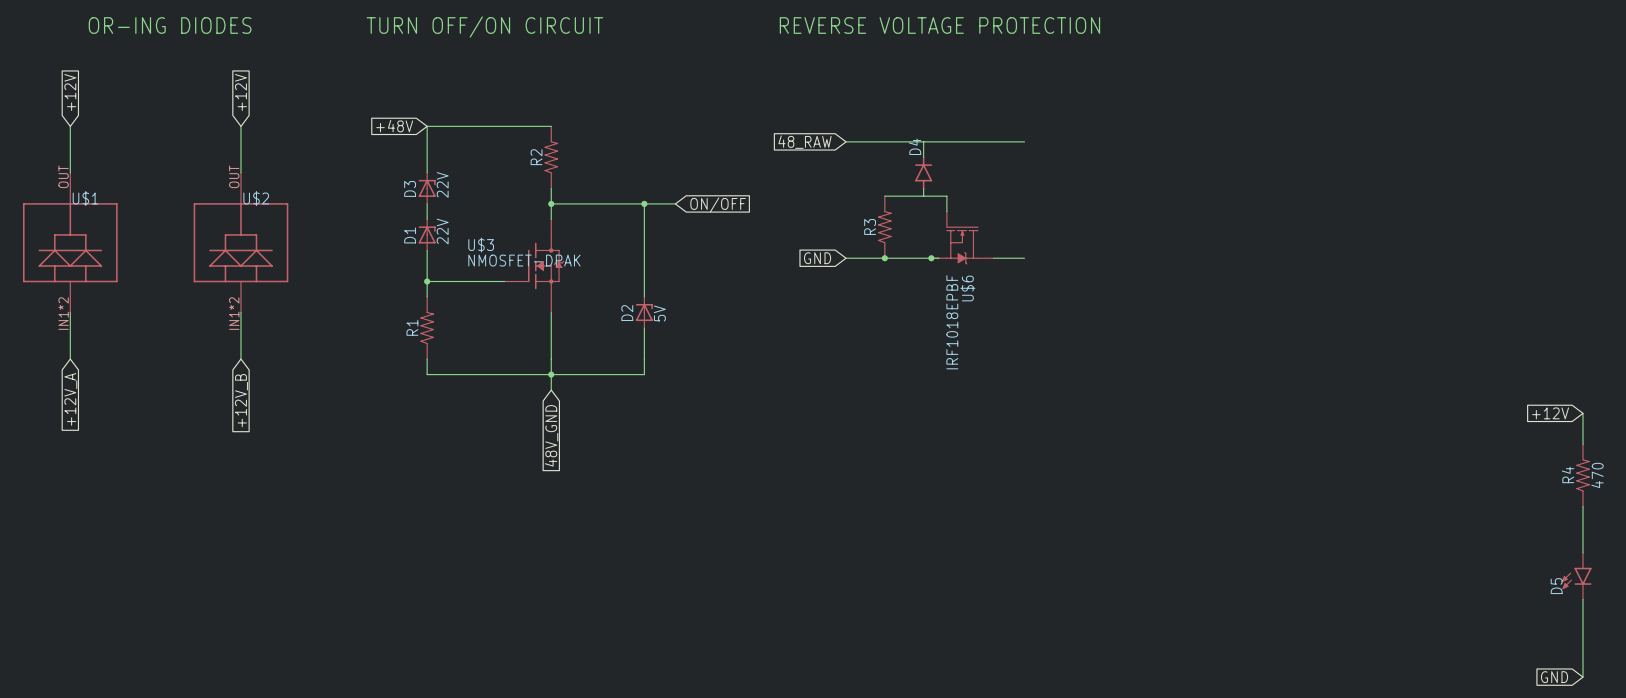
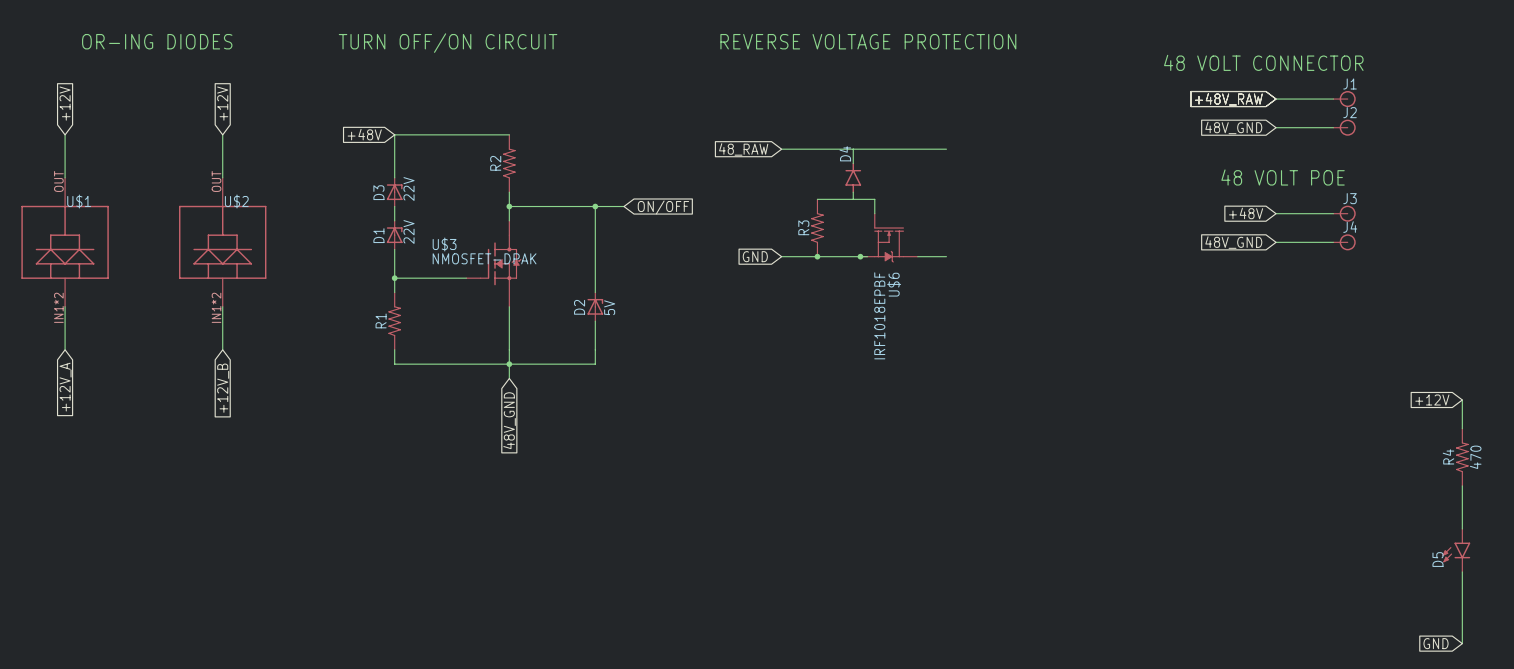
text: none -> 48 VOLT CONNECTOR (1263, 62)
global label: none -> +48V_RAW (1228, 99)
wire: none -> (1276, 99) (1333, 99)
J1: none -> (1344, 99)
global label: none -> 48V_GND (1233, 127)
wire: none -> (1276, 127) (1333, 127)
J2: none -> (1344, 127)
text: none -> 48 VOLT POE (1283, 177)
global label: none -> +48V (1246, 213)
wire: none -> (1276, 213) (1333, 213)
J3: none -> (1344, 213)
global label: none -> 48V_GND (1233, 242)
wire: none -> (1276, 242) (1333, 242)
J4: none -> (1344, 242)

